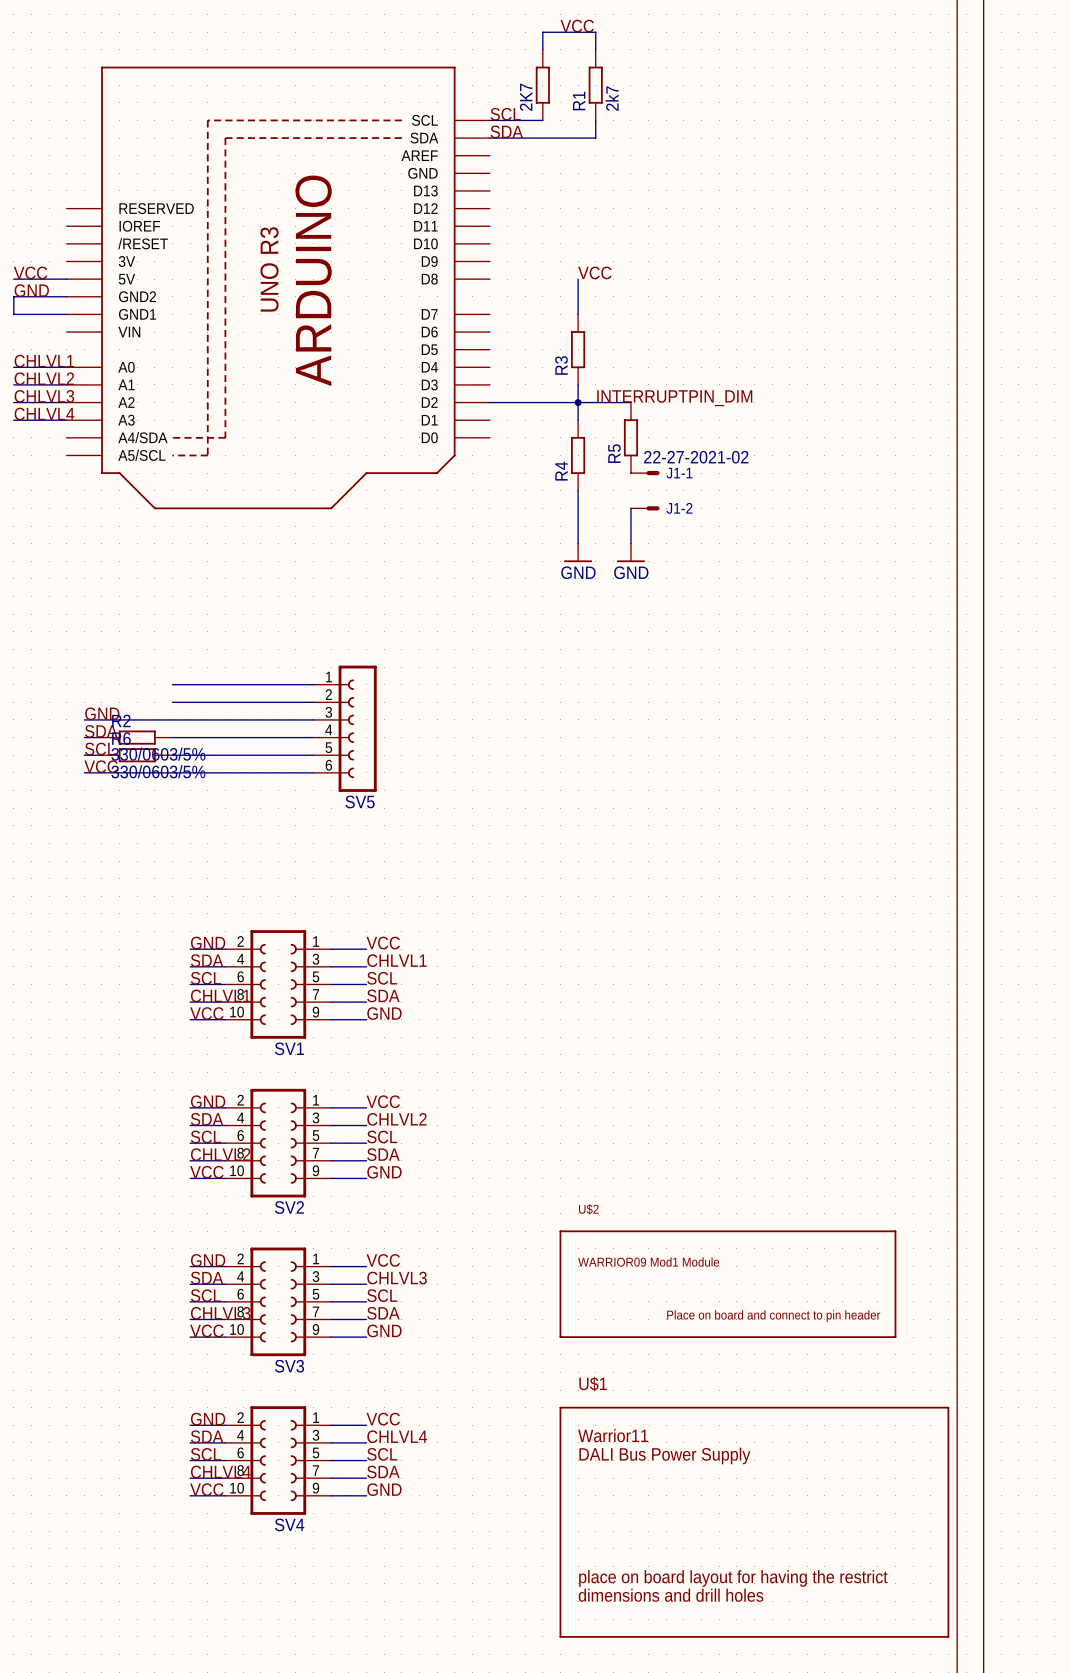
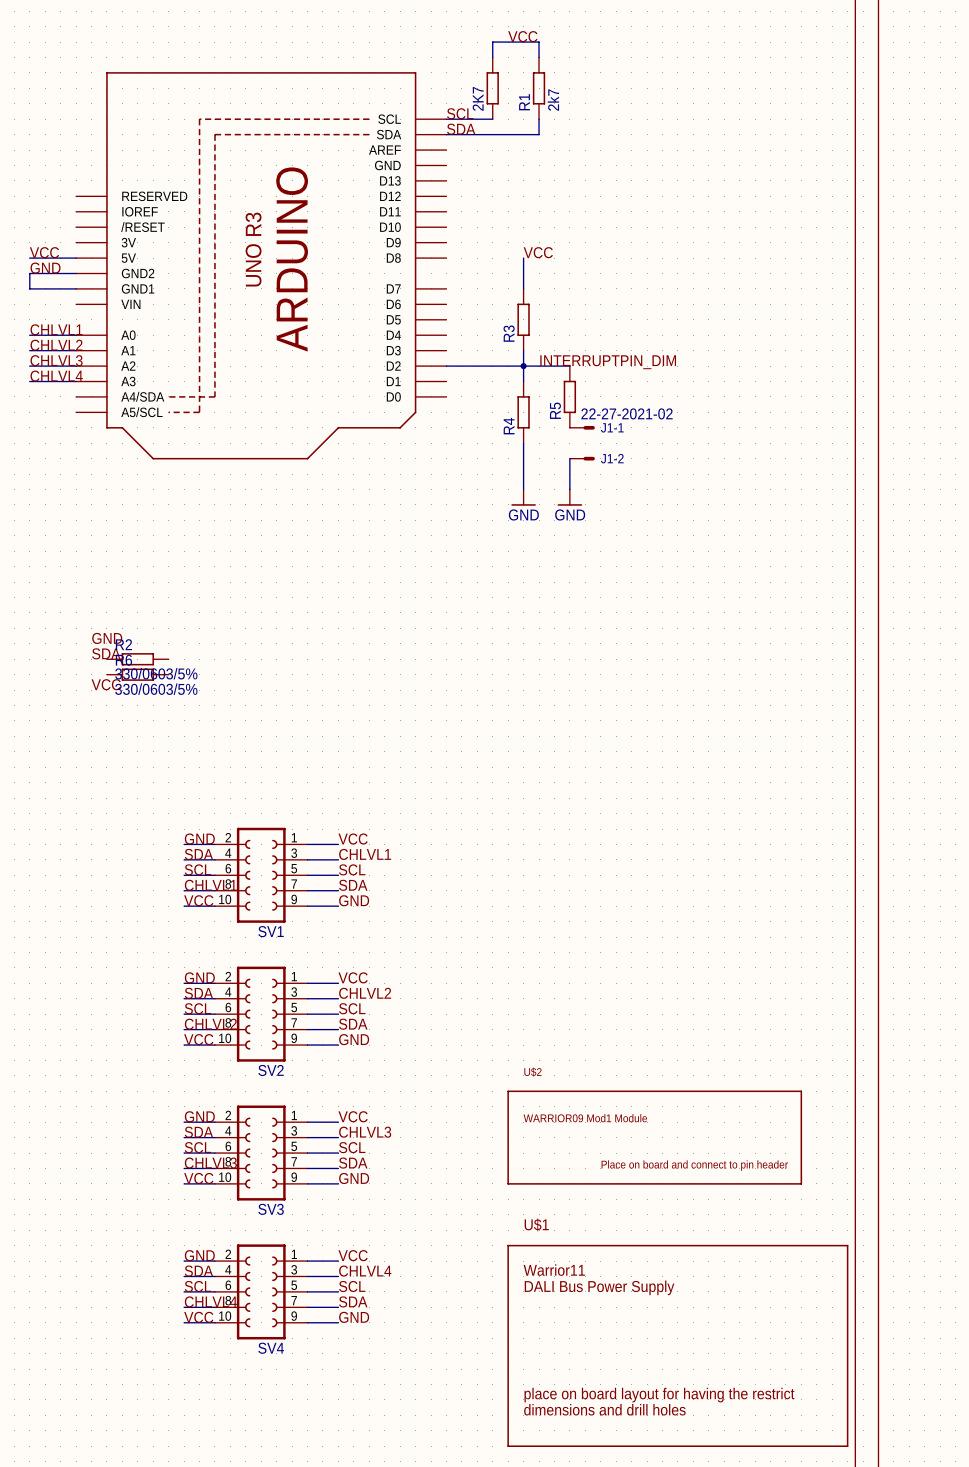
wire: (172, 684) (313, 684) -> none
wire: (172, 702) (313, 702) -> none
wire: (84, 719) (313, 719) -> none
SV5: (345, 728) -> none
wire: (84, 737) (101, 737) -> none
wire: (172, 737) (313, 737) -> none
label: SCL (100, 749) -> none
wire: (84, 755) (101, 755) -> none
wire: (172, 755) (313, 755) -> none
wire: (84, 772) (313, 772) -> none

